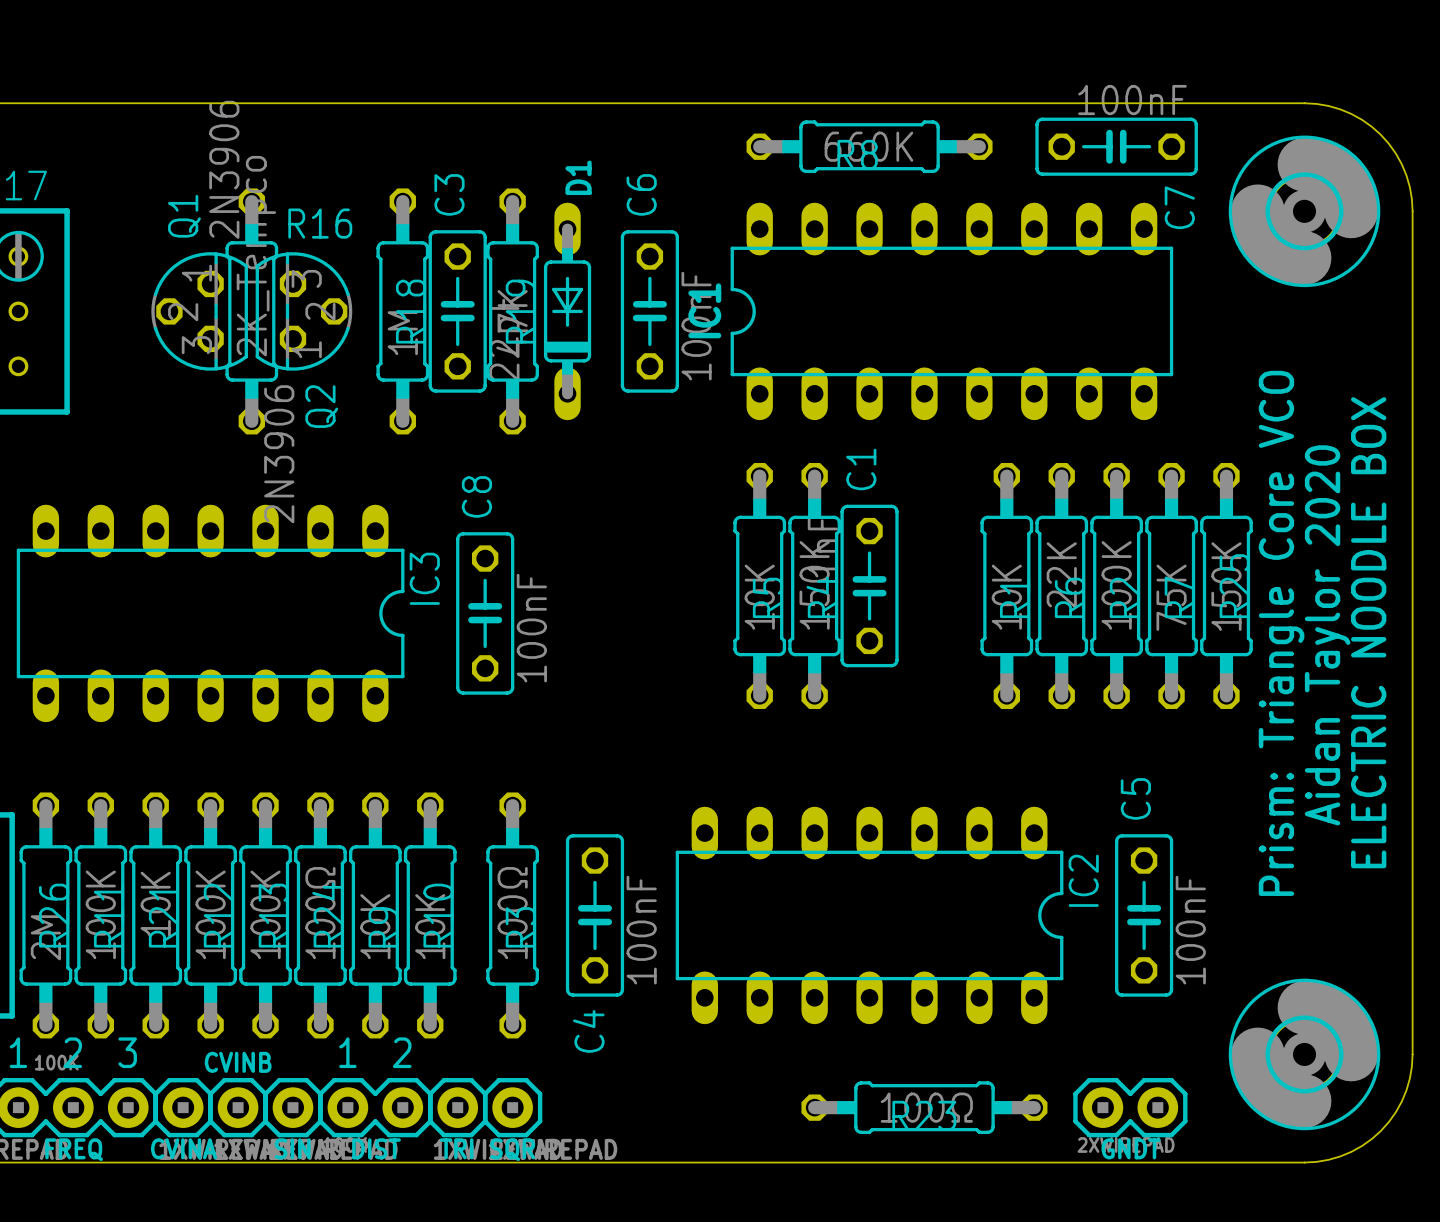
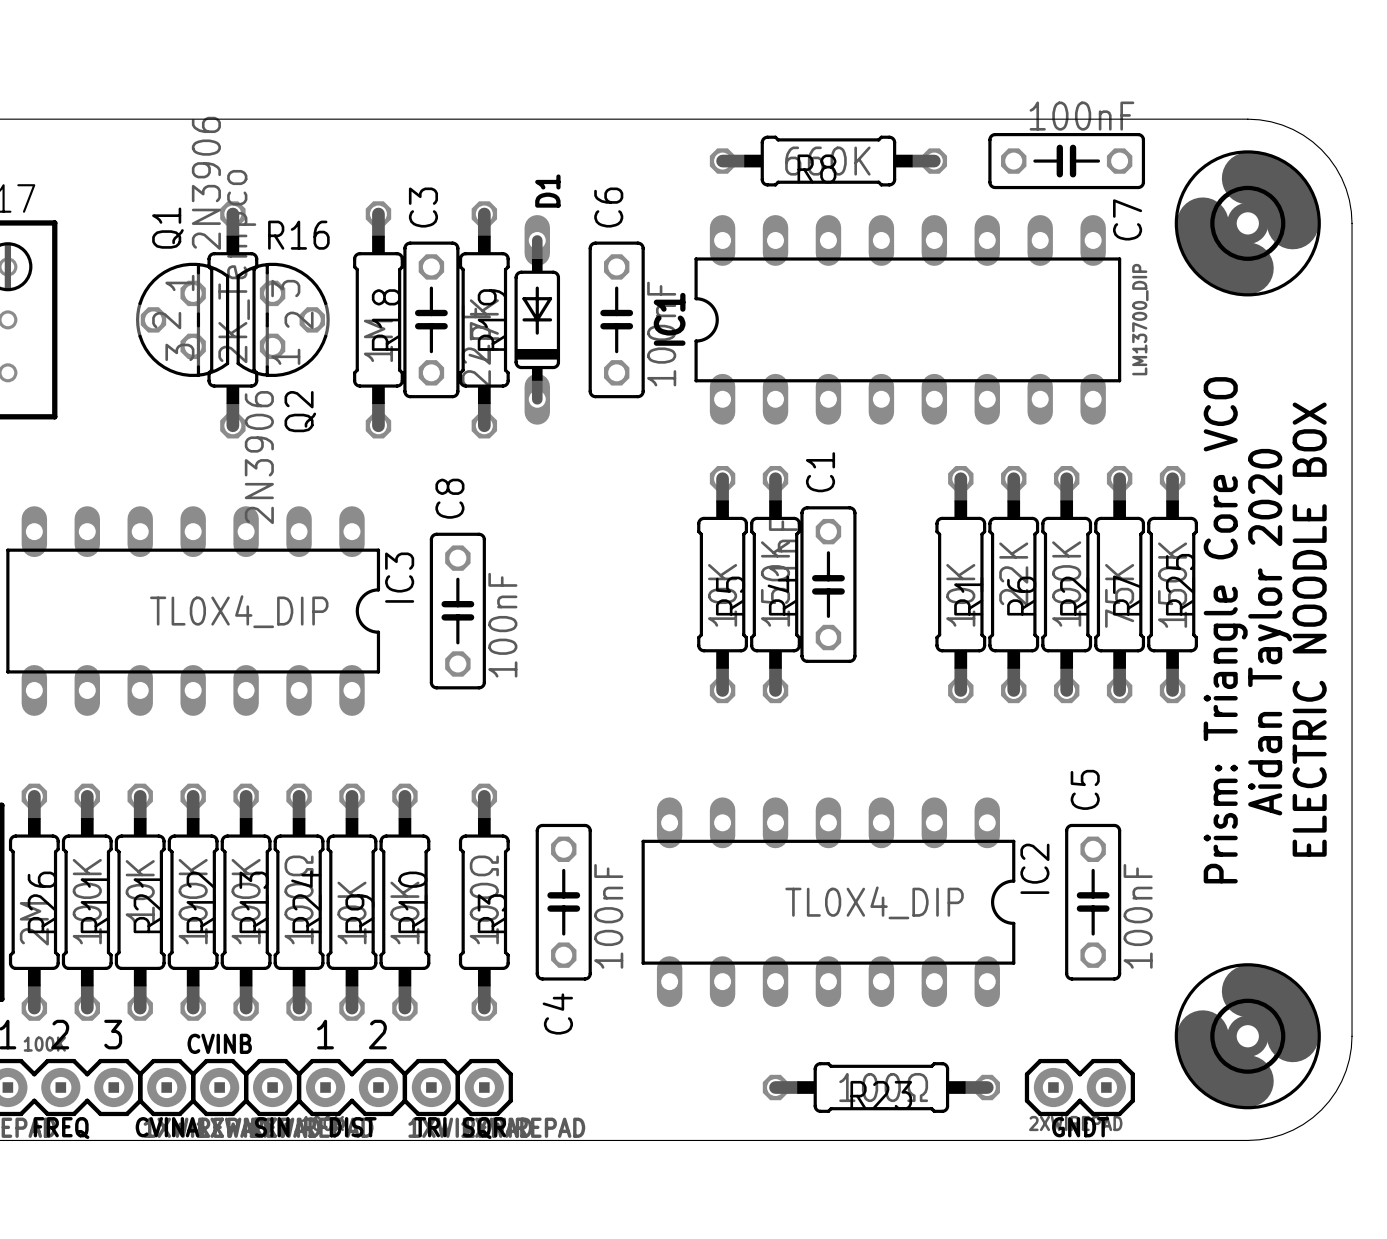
IC1 value: none -> LM13700_DIP (1140, 319)
IC3 value: none -> TL0X4_DIP (239, 611)
IC2 value: none -> TL0X4_DIP (874, 902)

